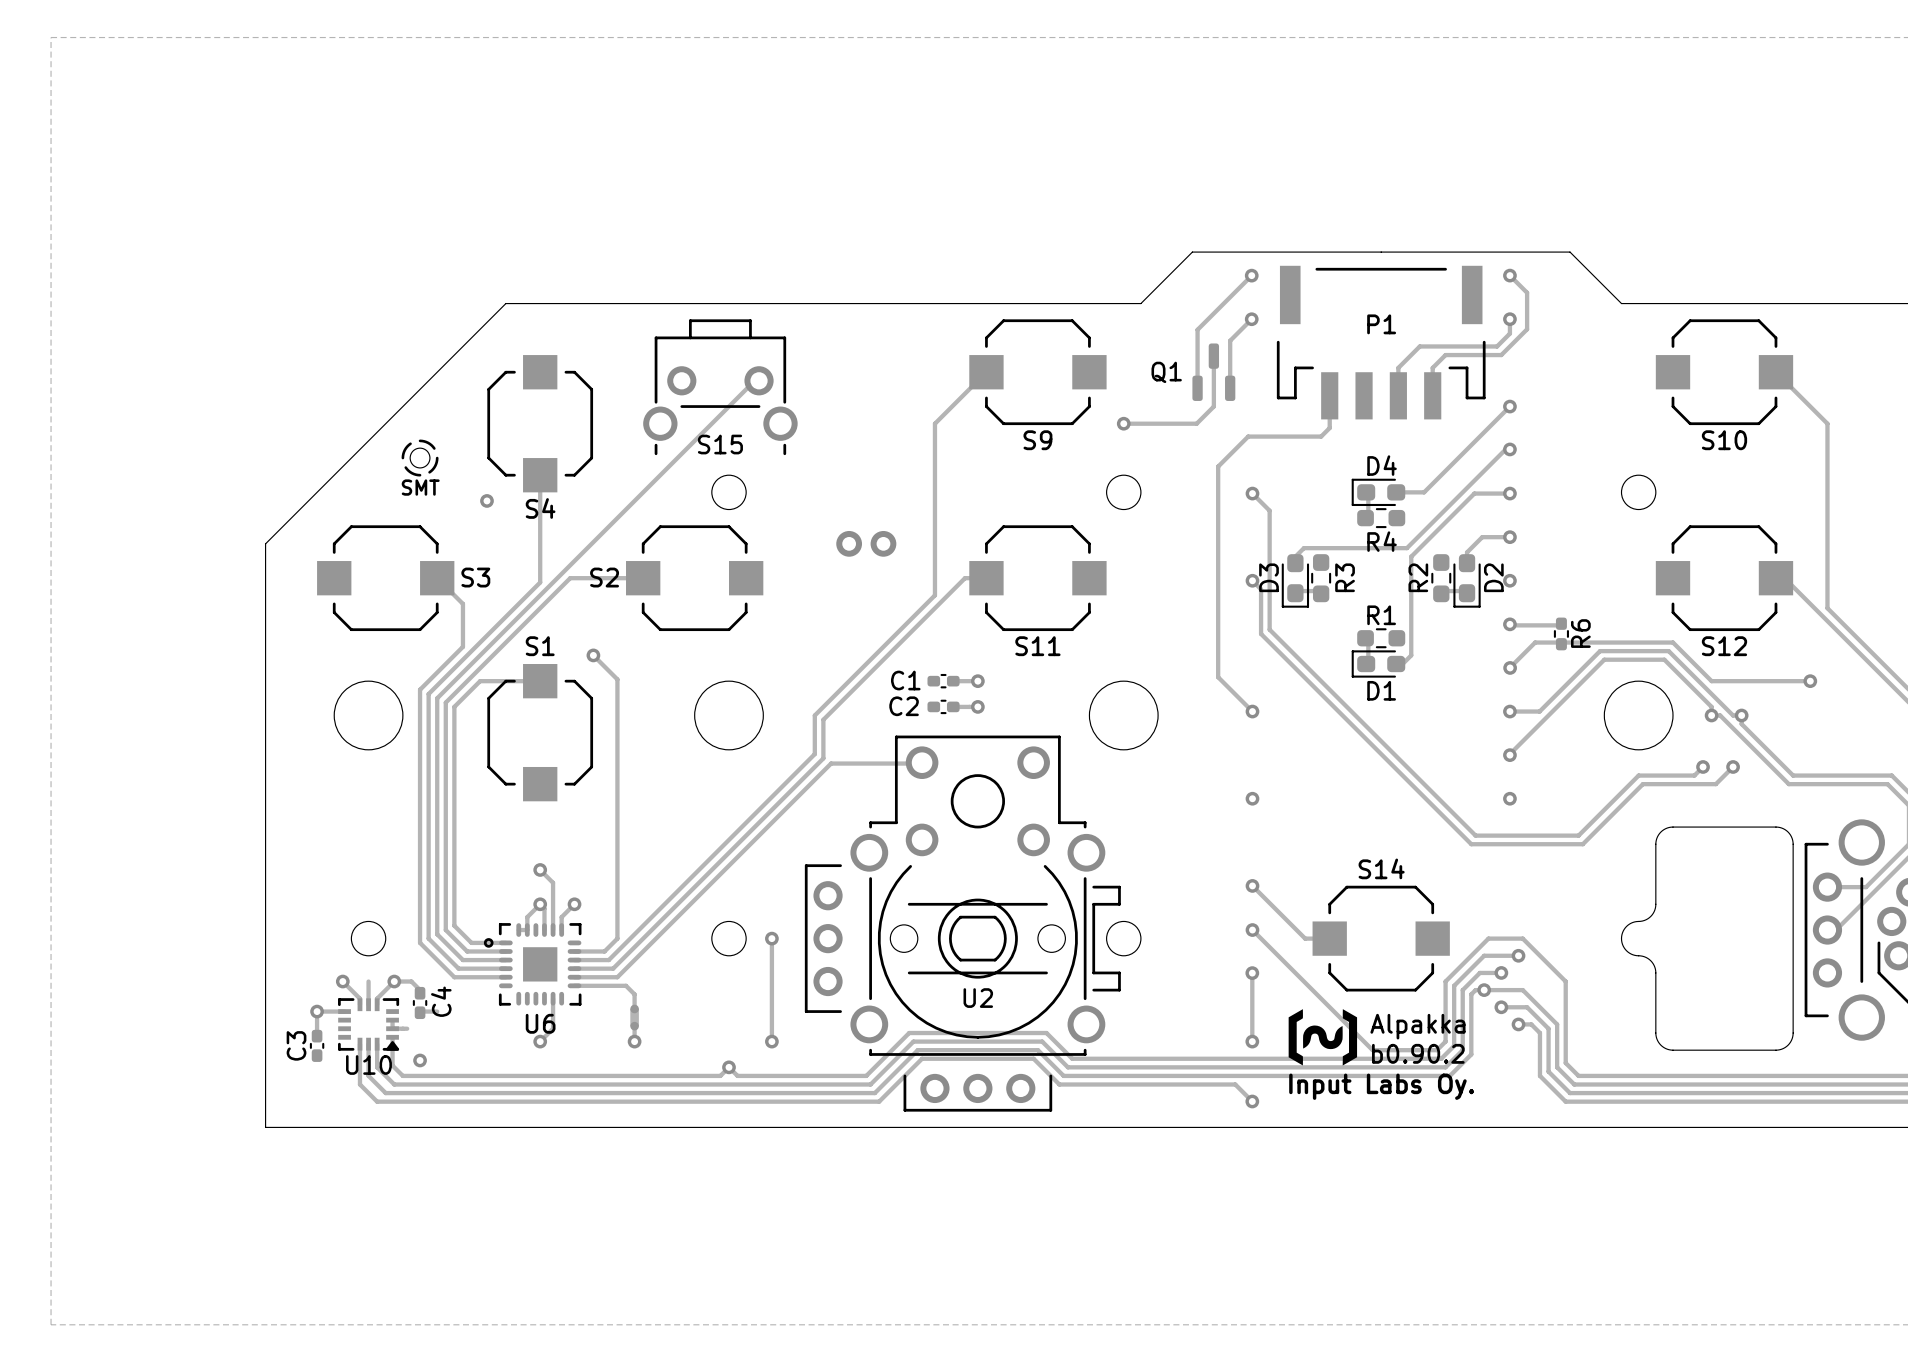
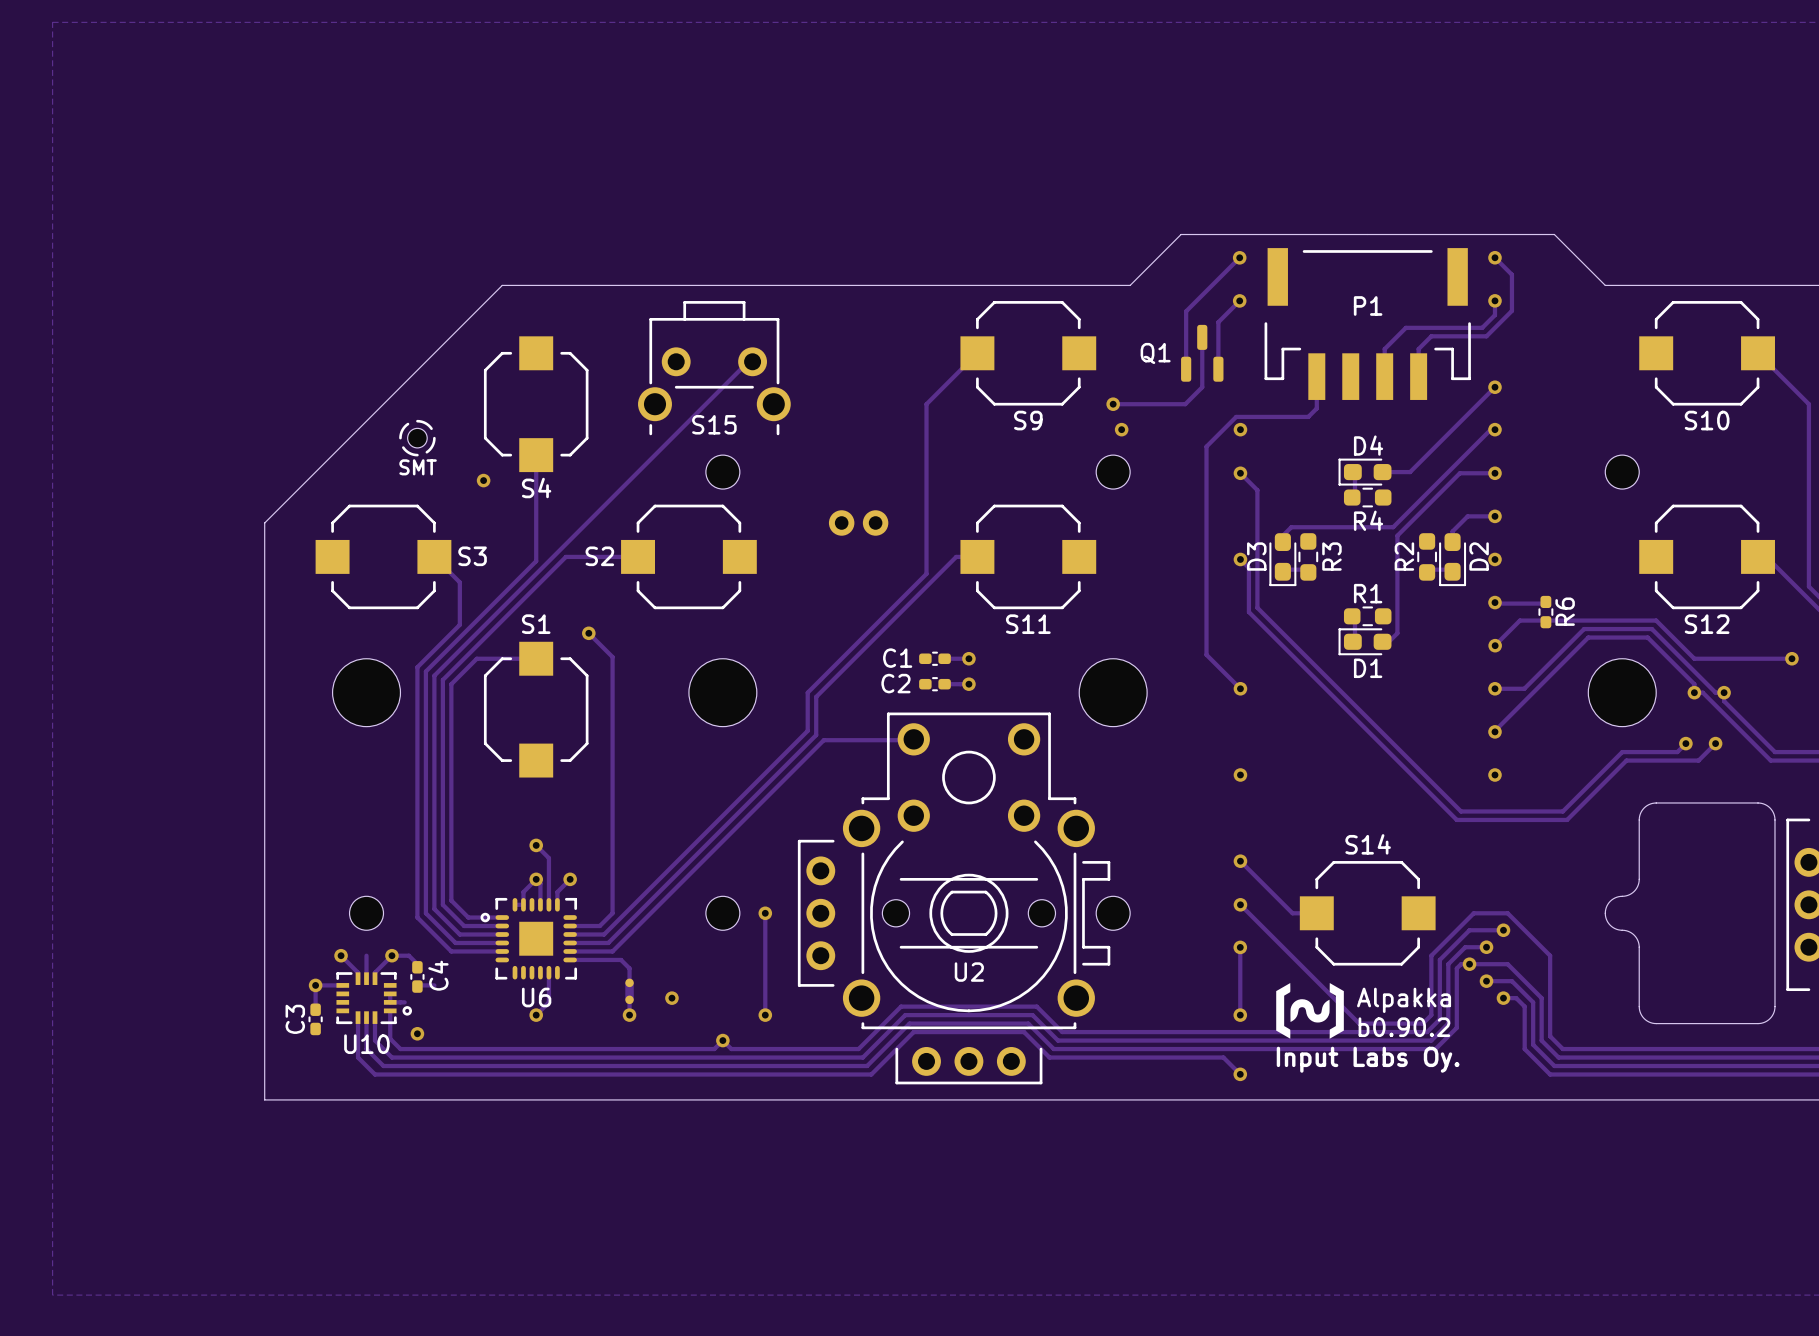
via: none -> (1121, 429)
via: none -> (1240, 429)
U10 footprint: [338, 998, 400, 1051] -> [336, 972, 412, 1025]
via: none -> (671, 998)

